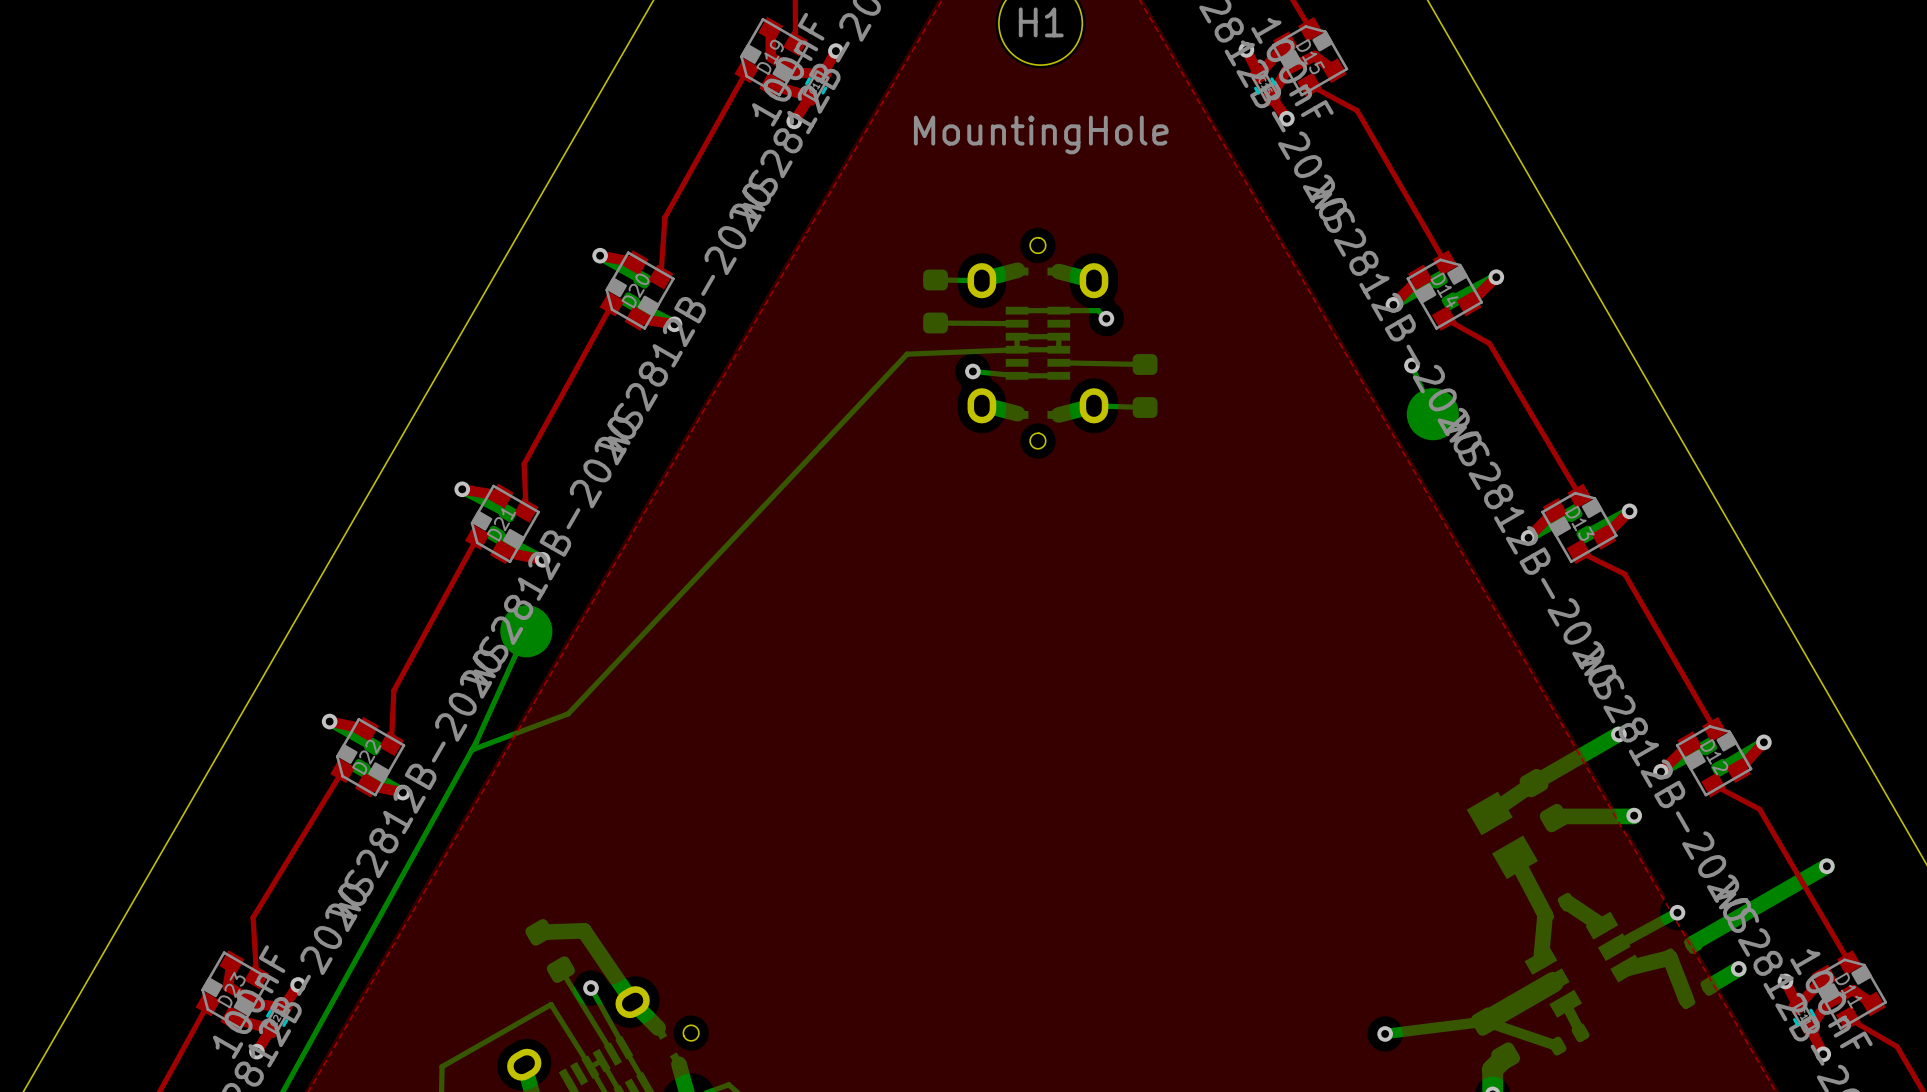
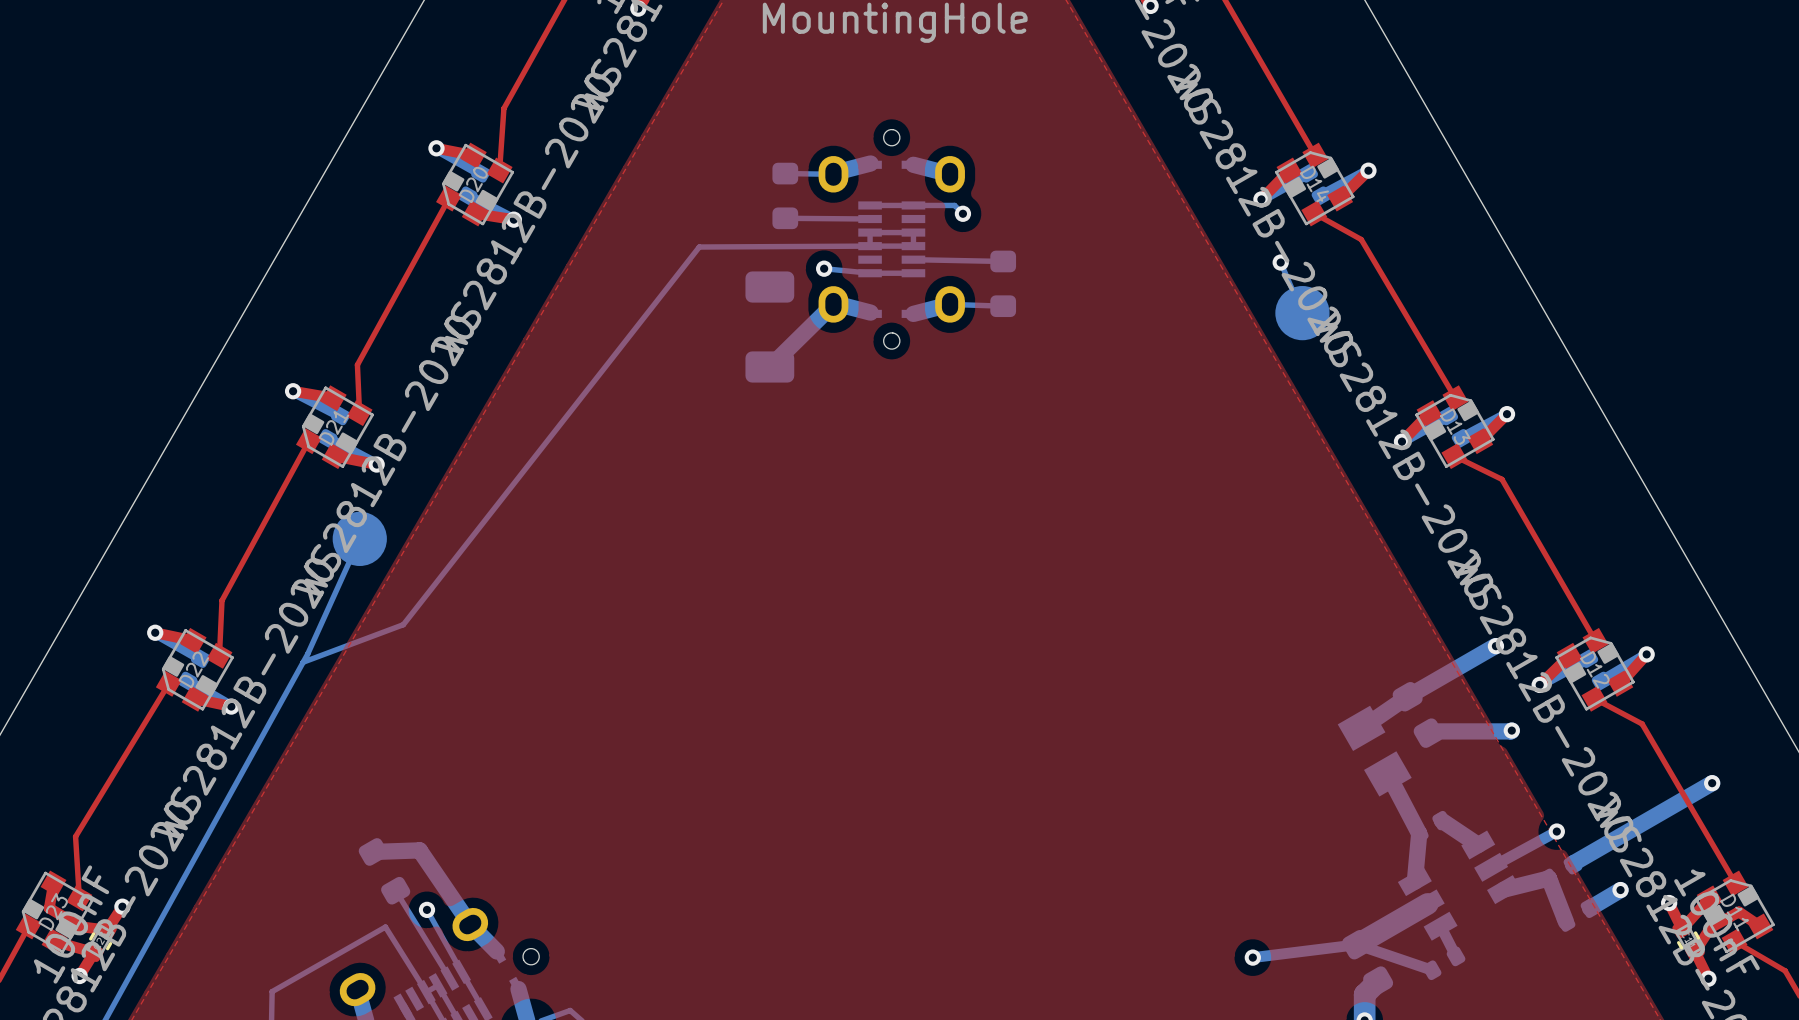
bottom track: (1017, 349) (907, 354) (568, 713) -> (870, 246) (699, 247) (403, 624)
bottom track: none -> (833, 304) (769, 366)
part: none -> (769, 327)

